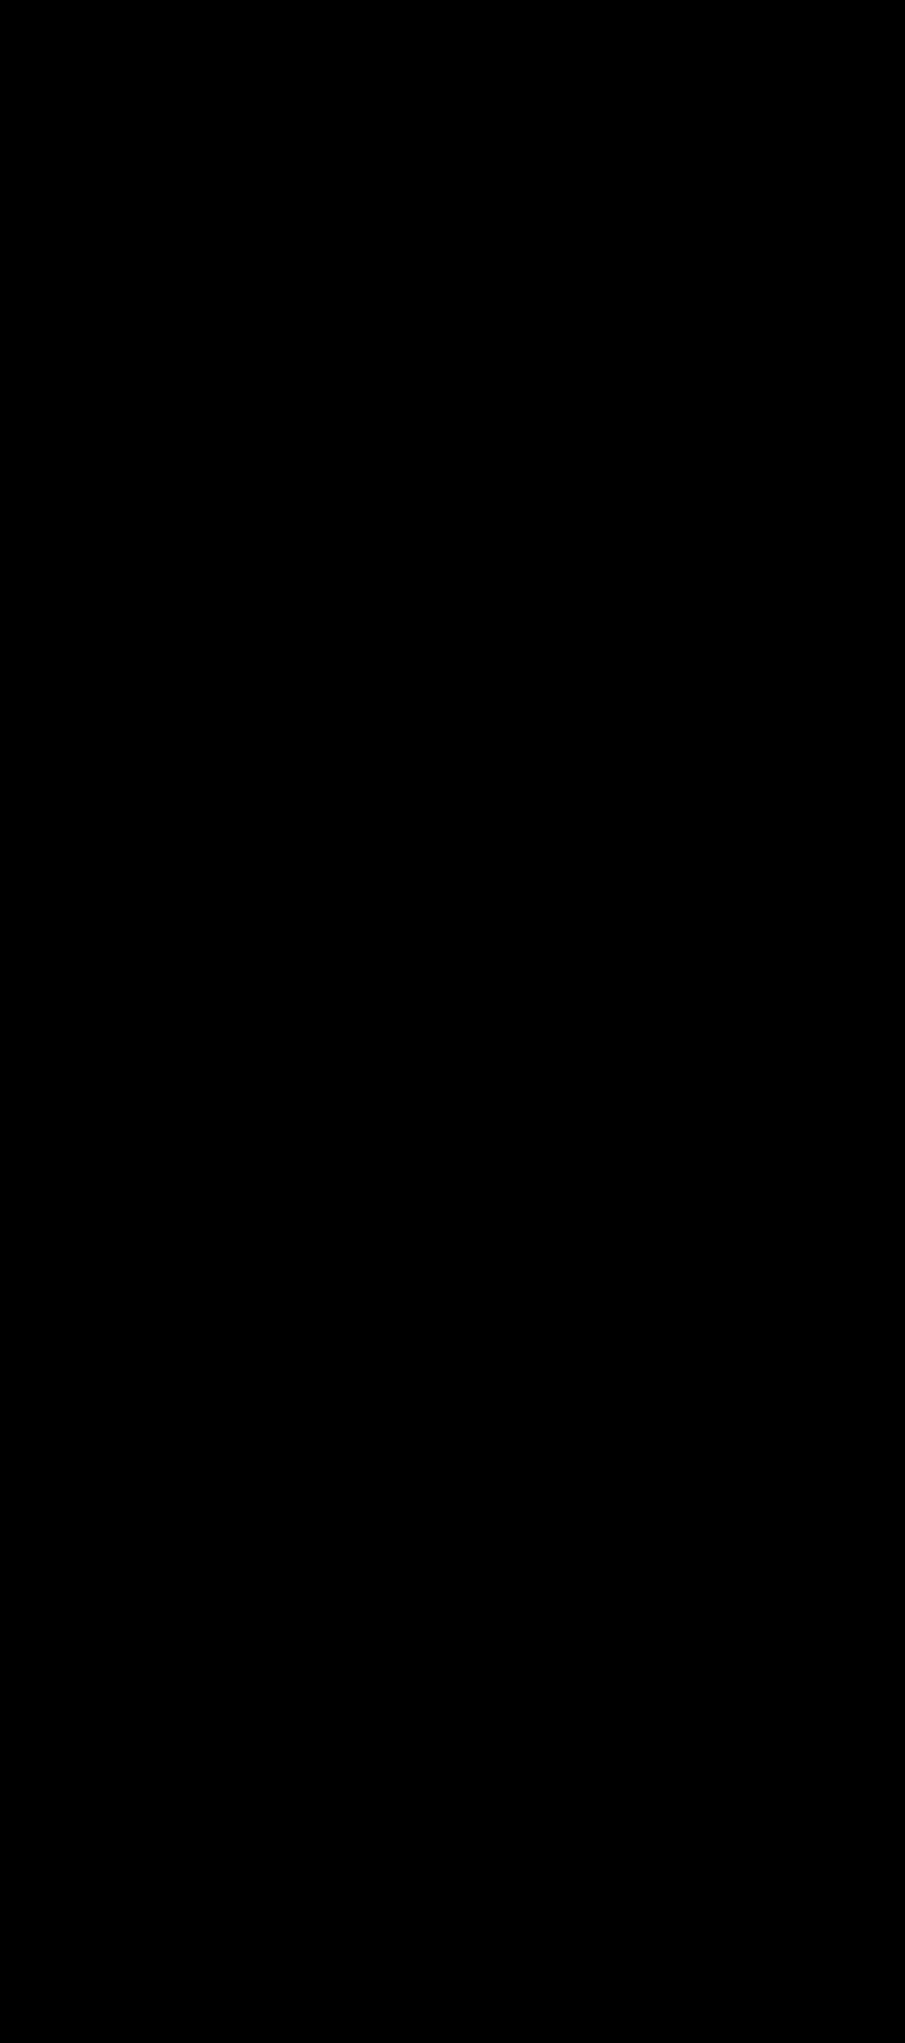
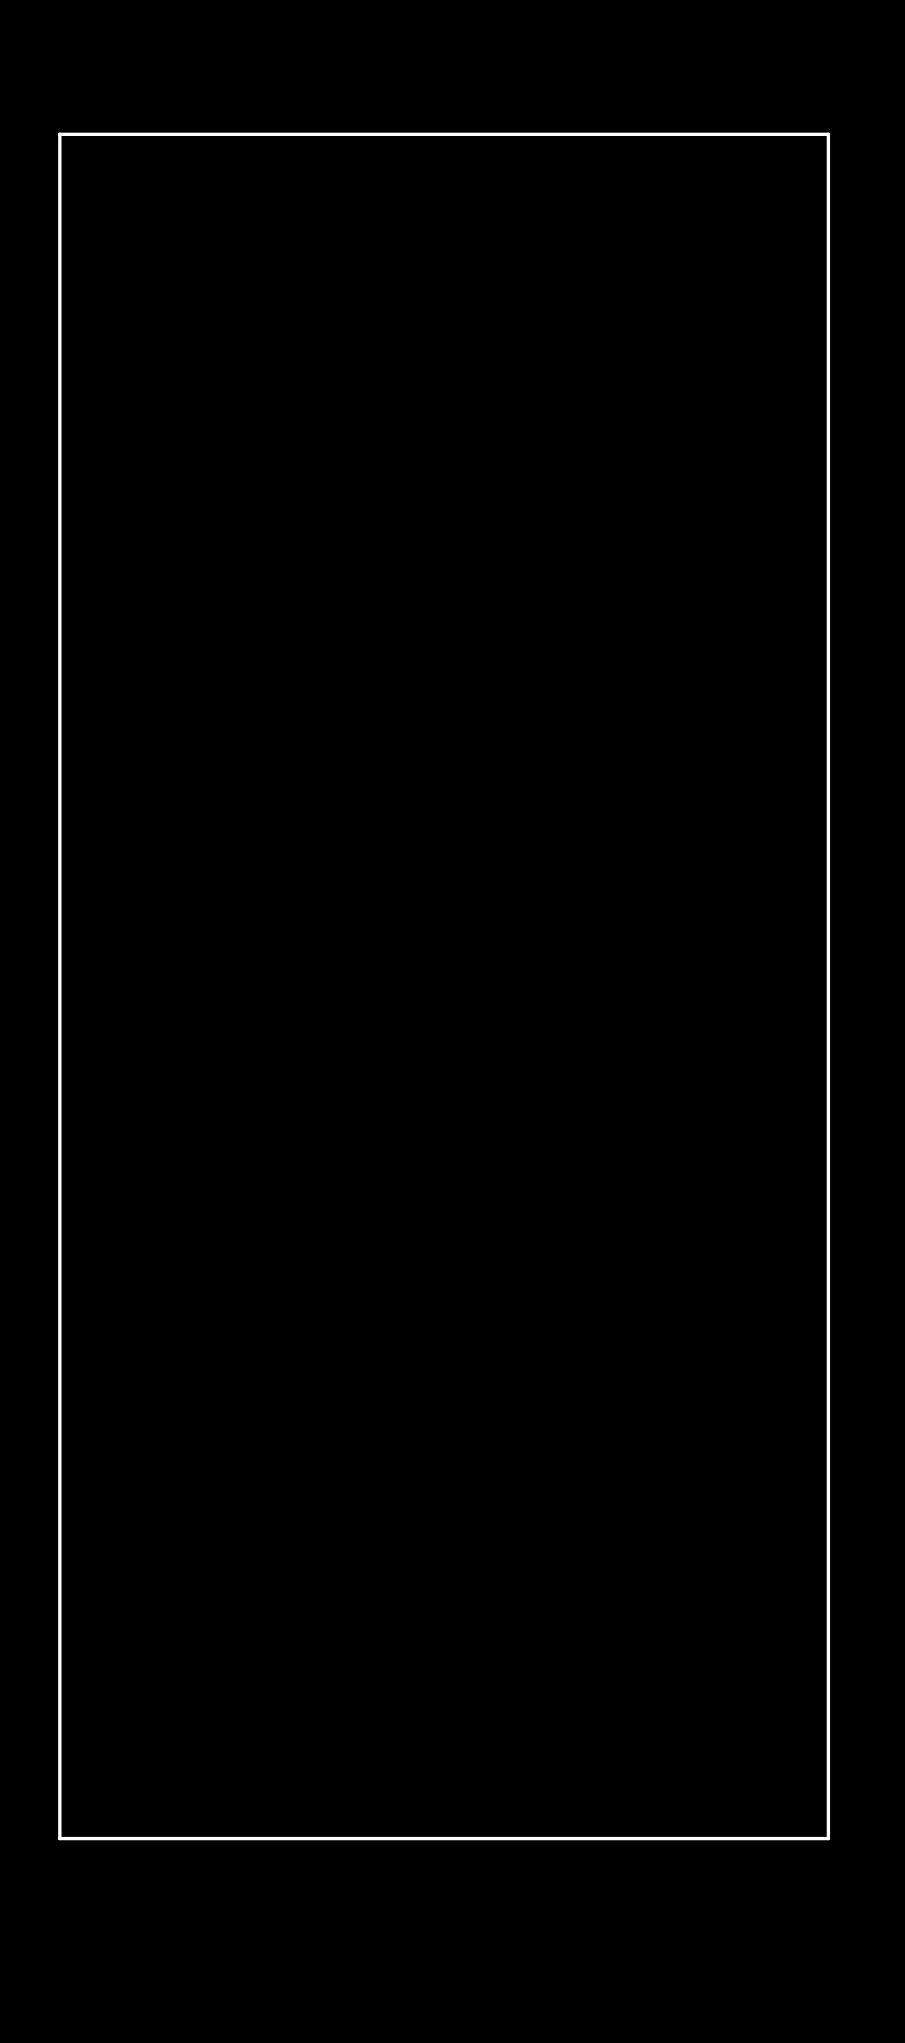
board edge: none -> (59, 134) (828, 134) (828, 1838) (59, 1838) (59, 134)

